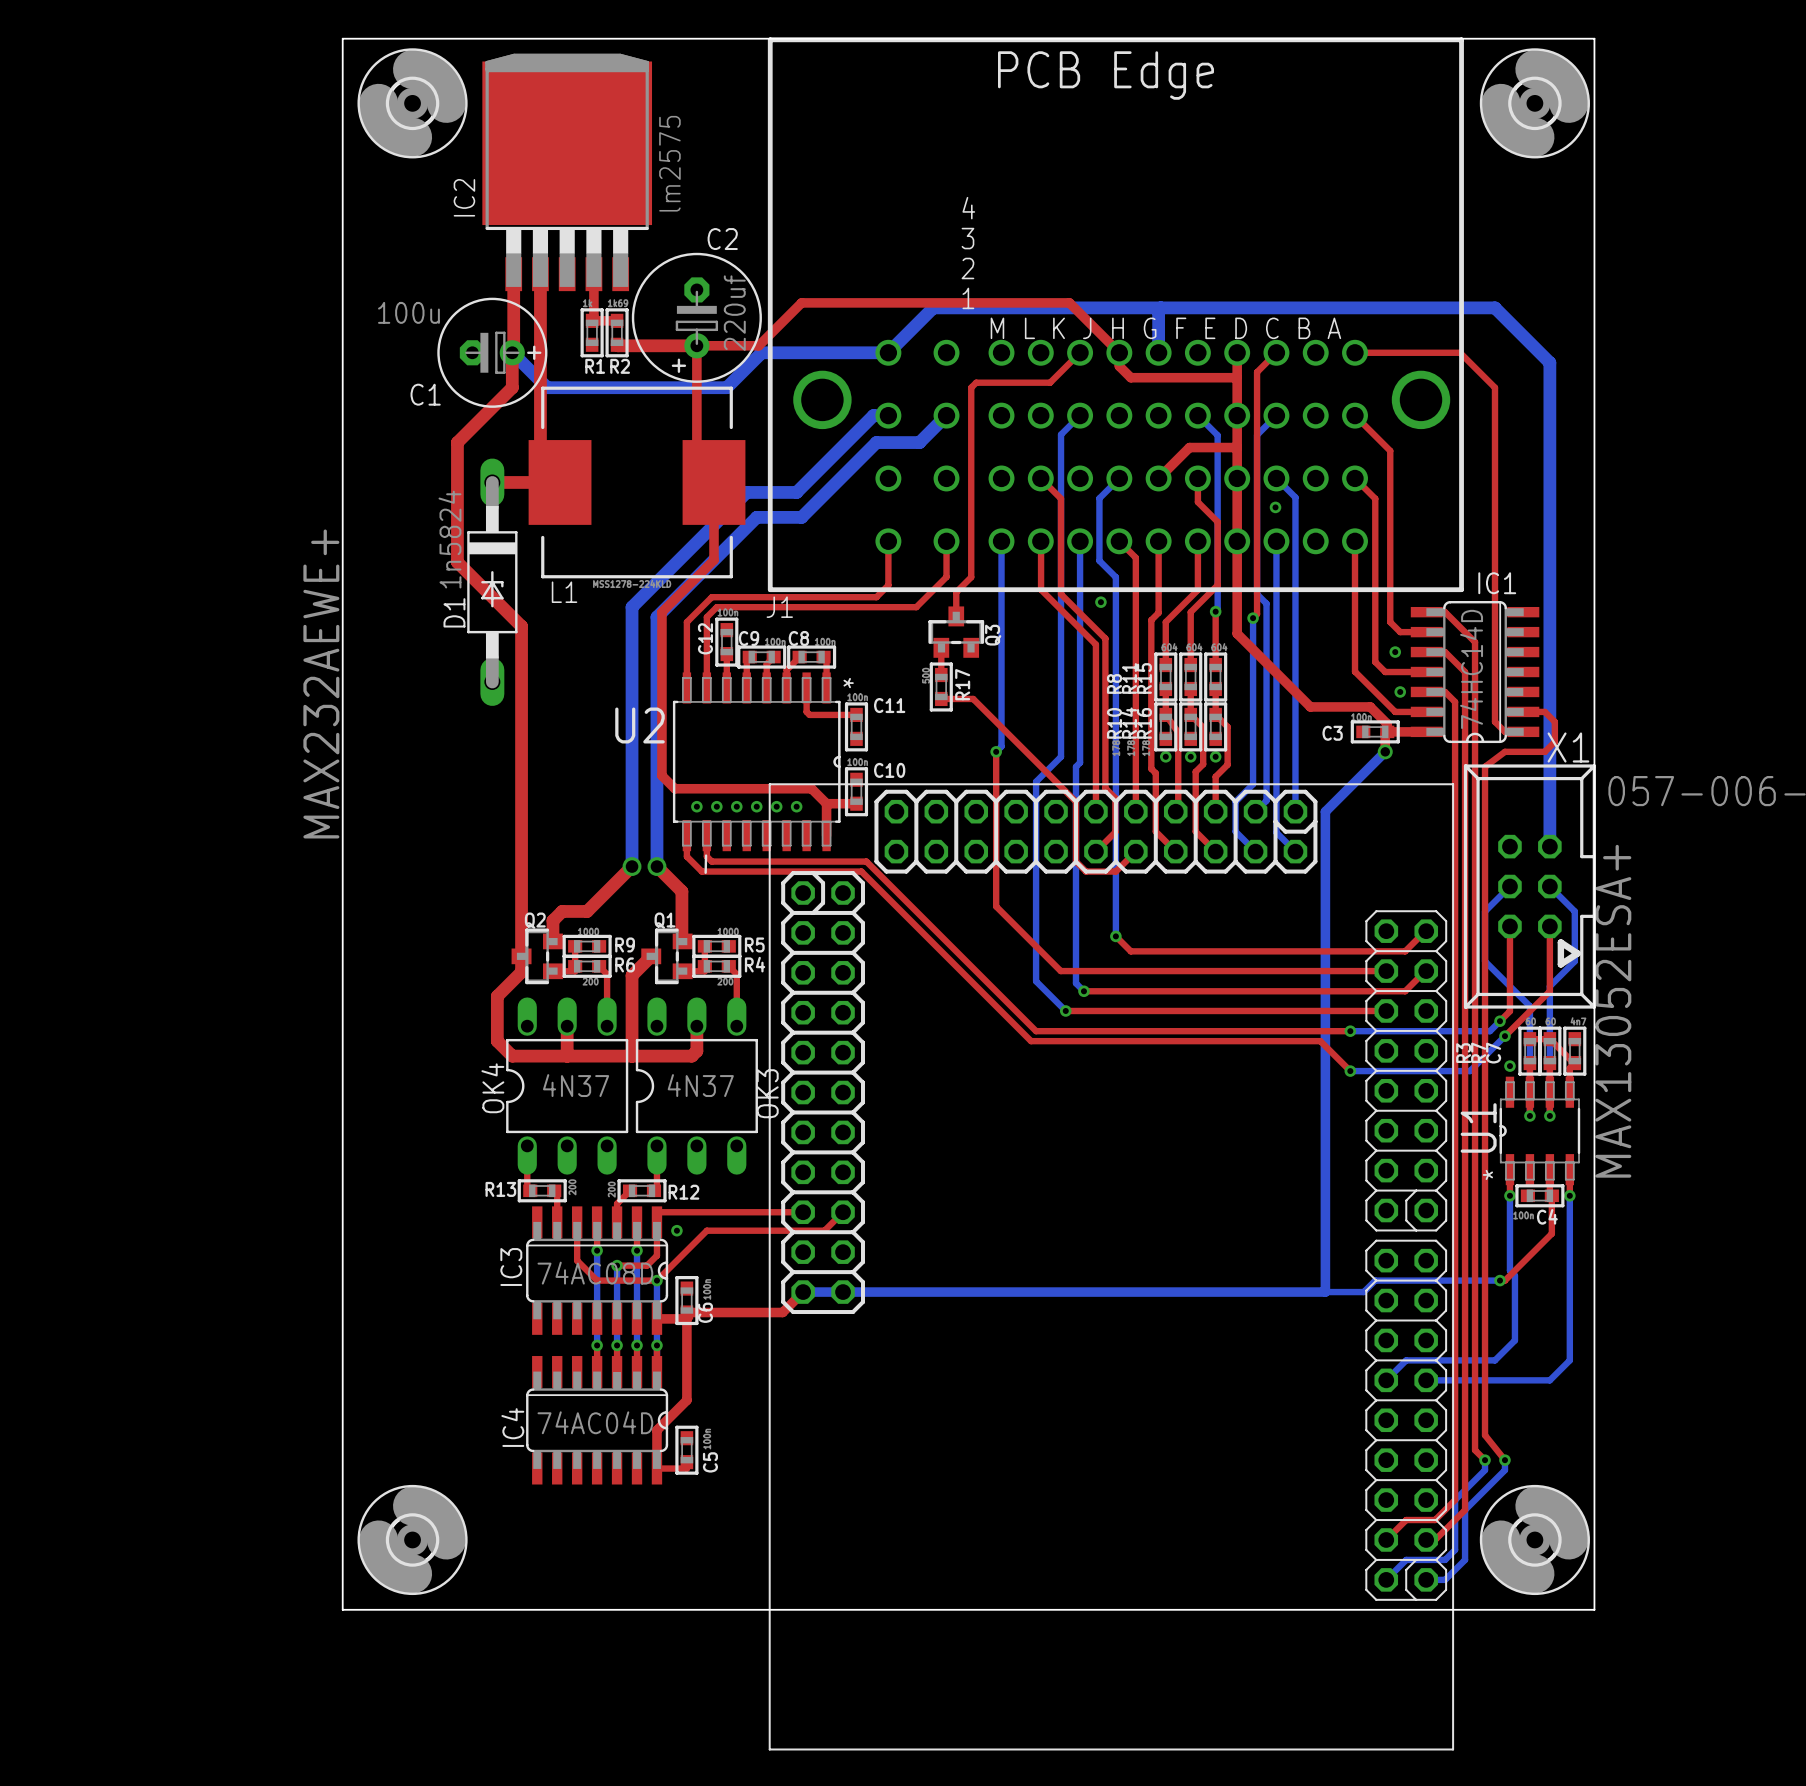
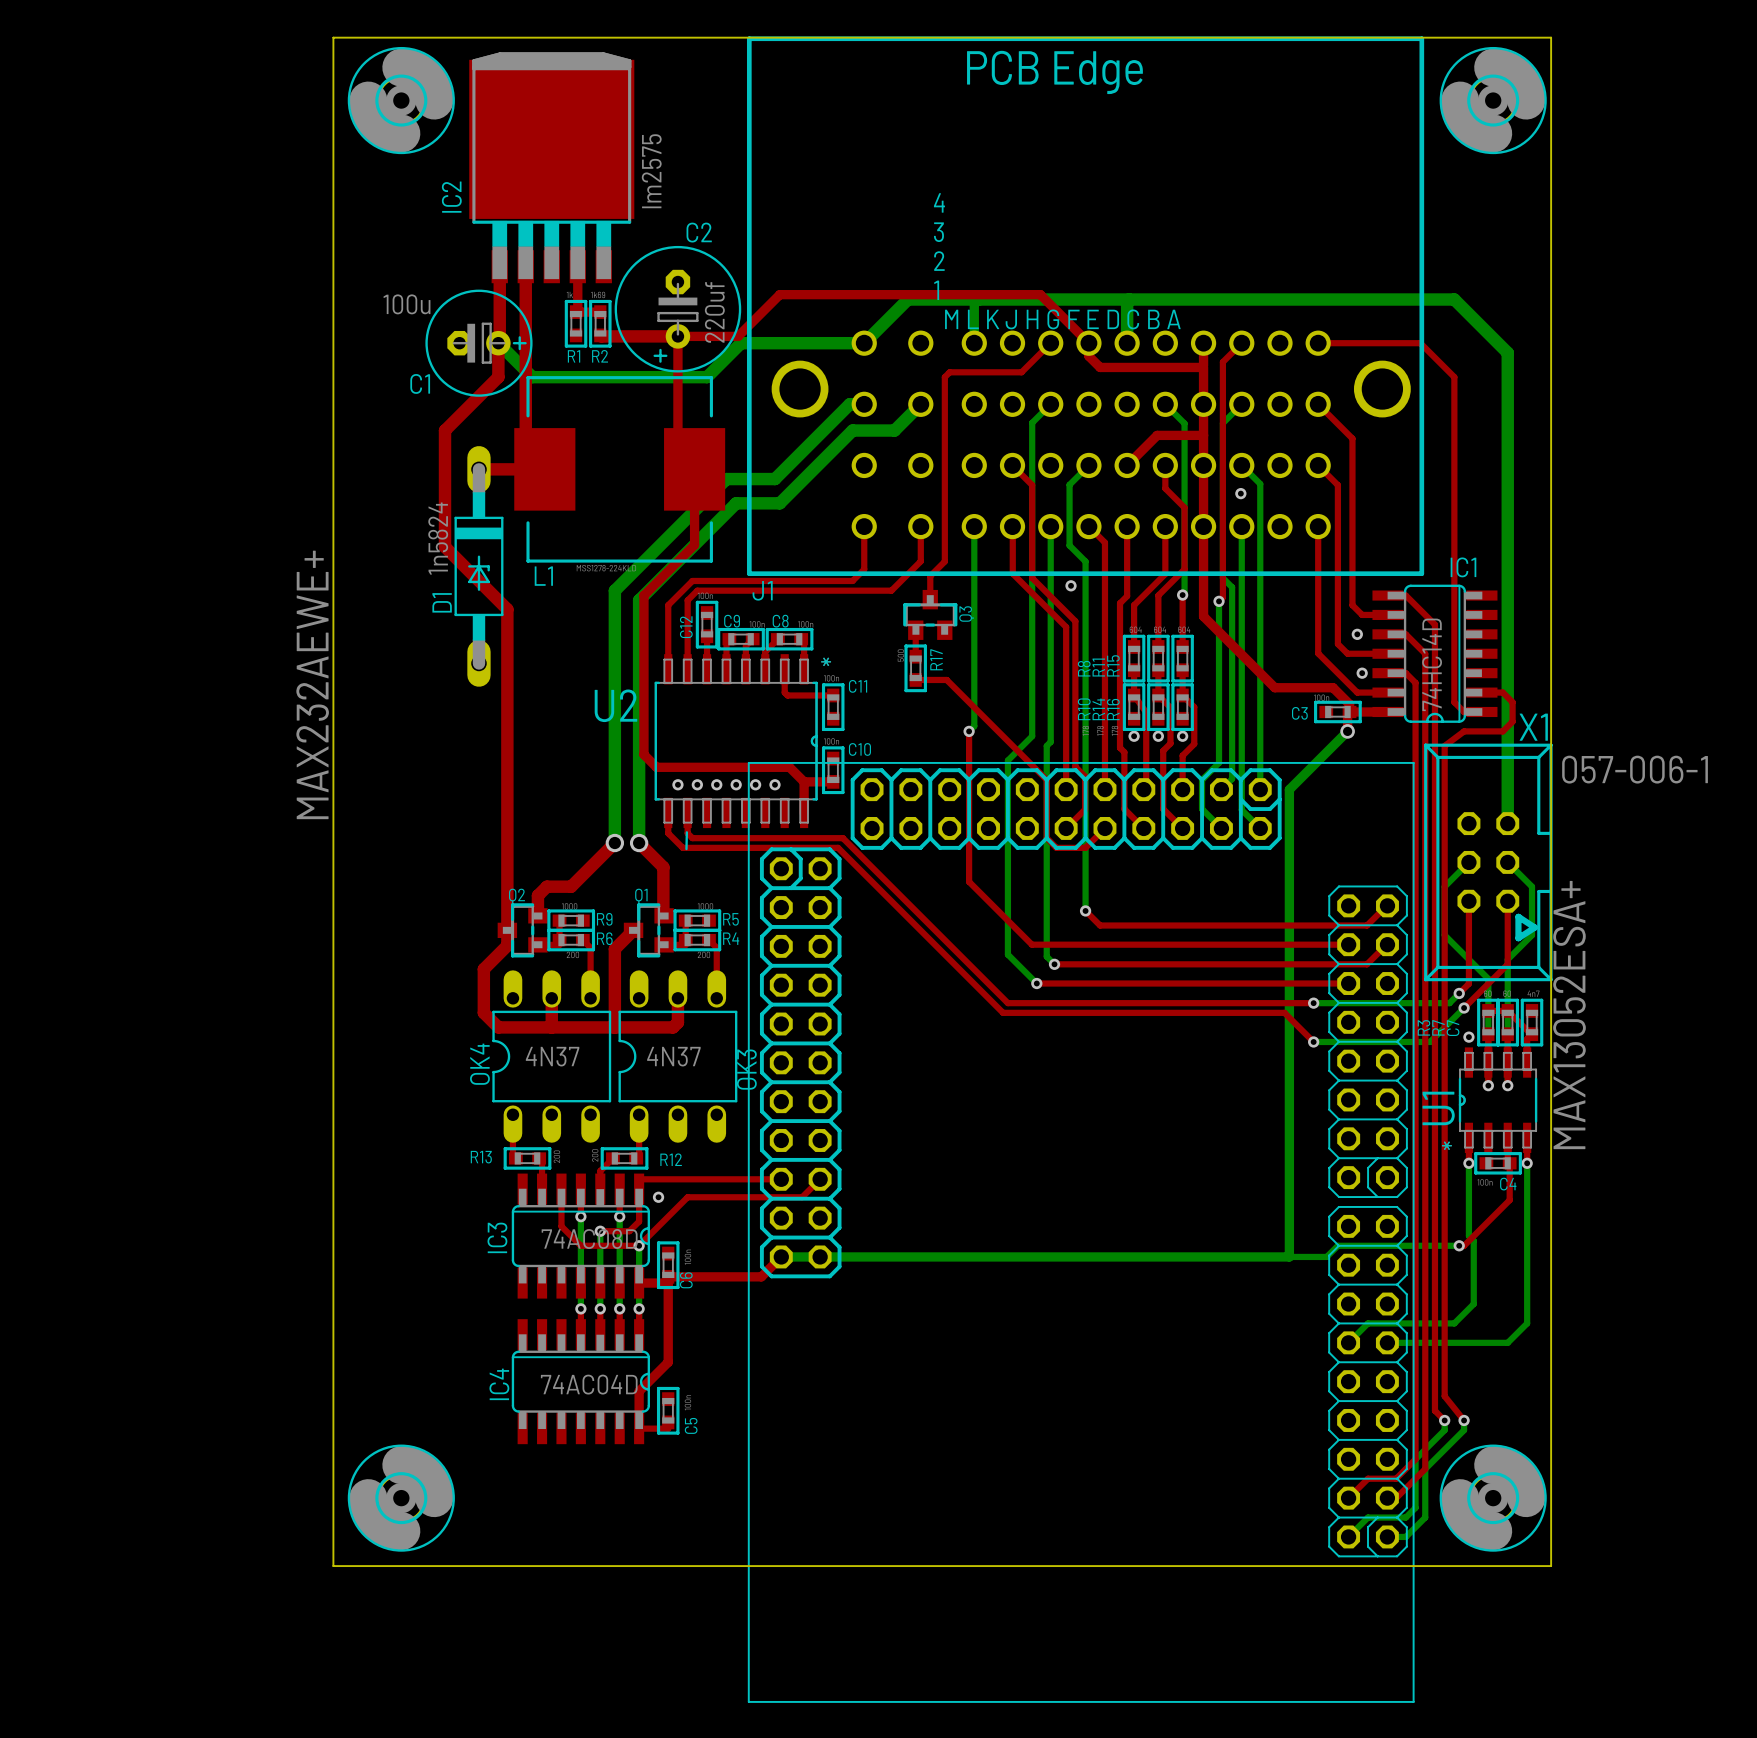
bottom track: none -> (978, 299) (974, 304) (974, 343)

